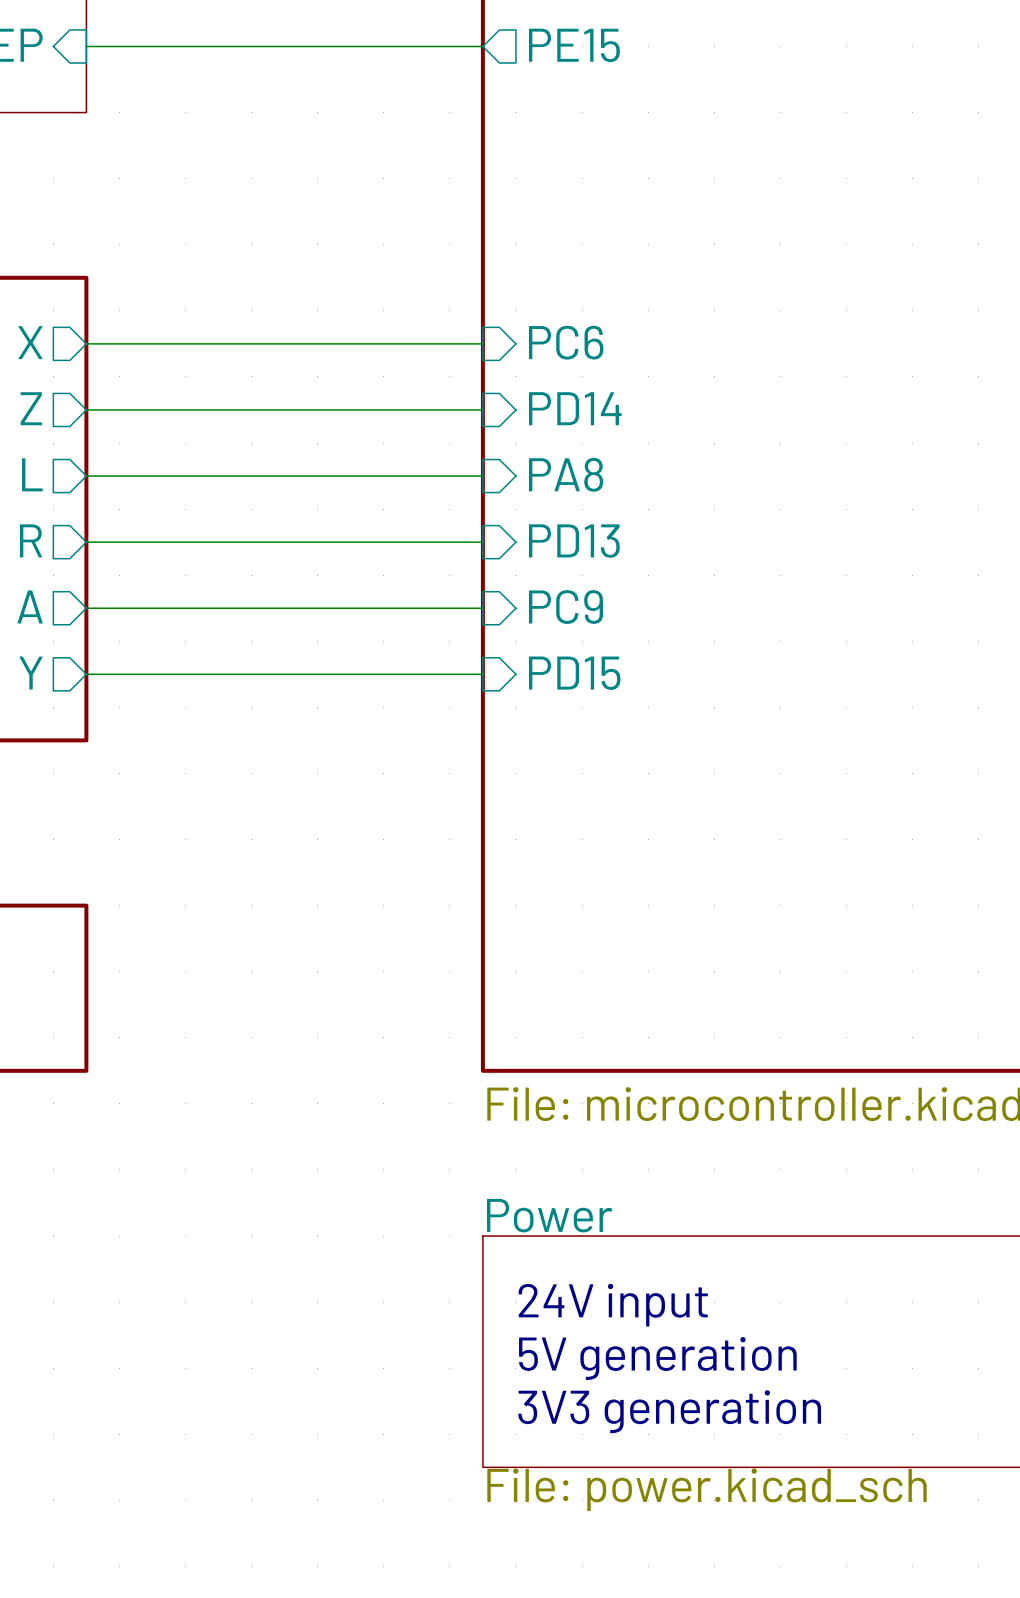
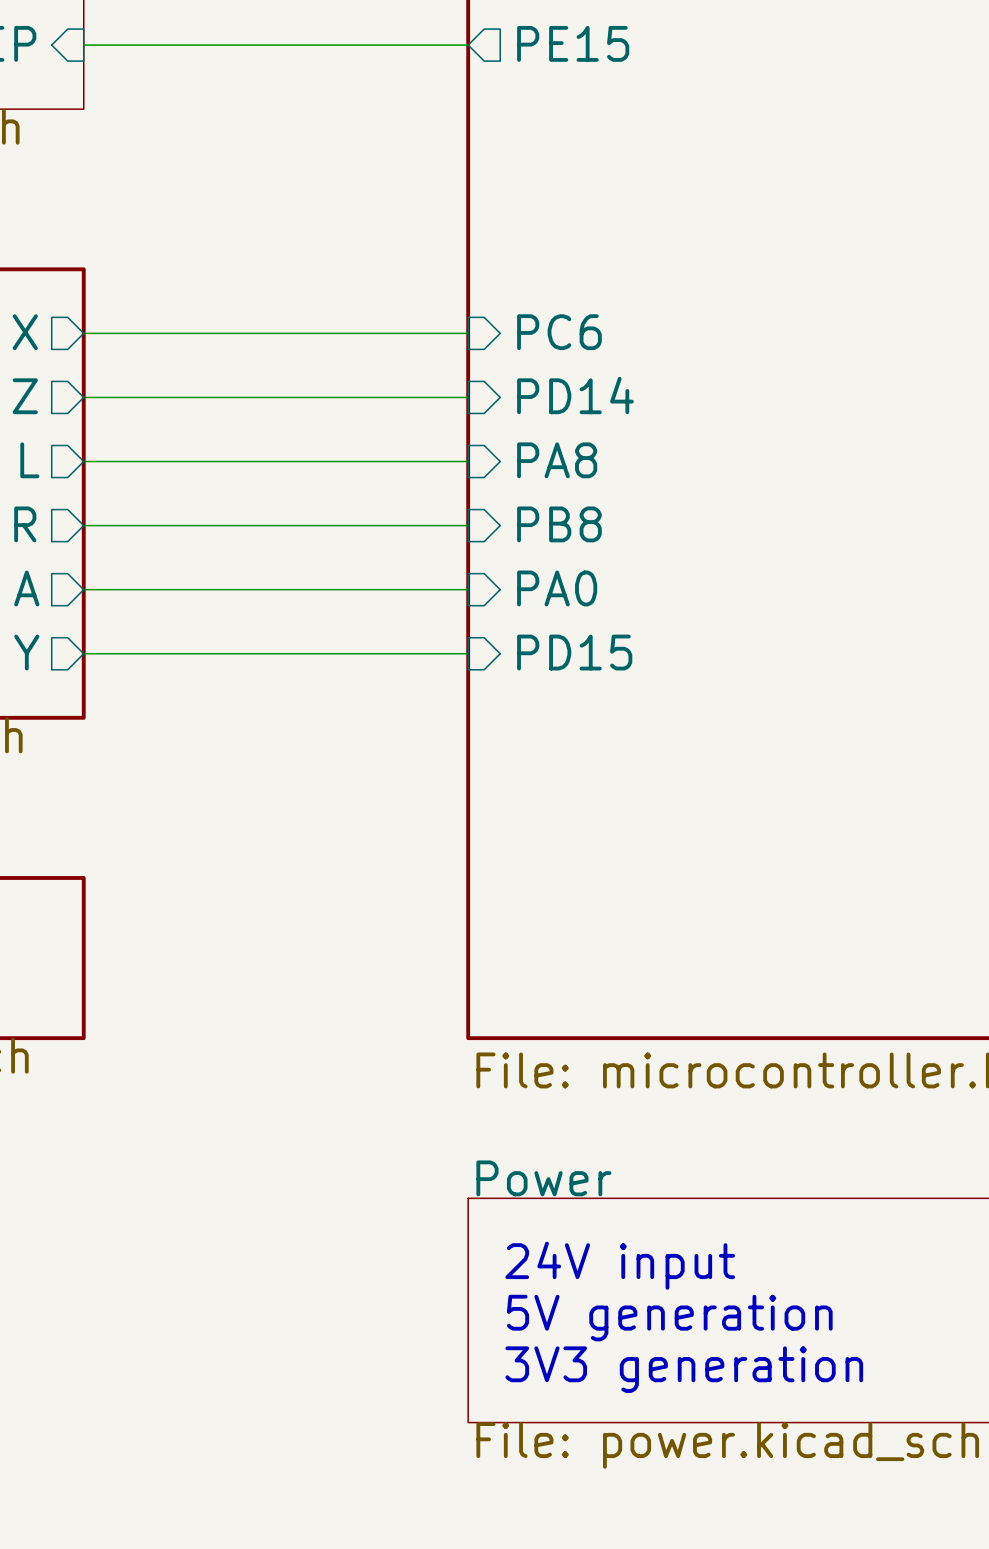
sheet pin: PD13 (574, 541) -> PB8 (559, 524)
sheet pin: PC9 (565, 607) -> PA0 (557, 588)

